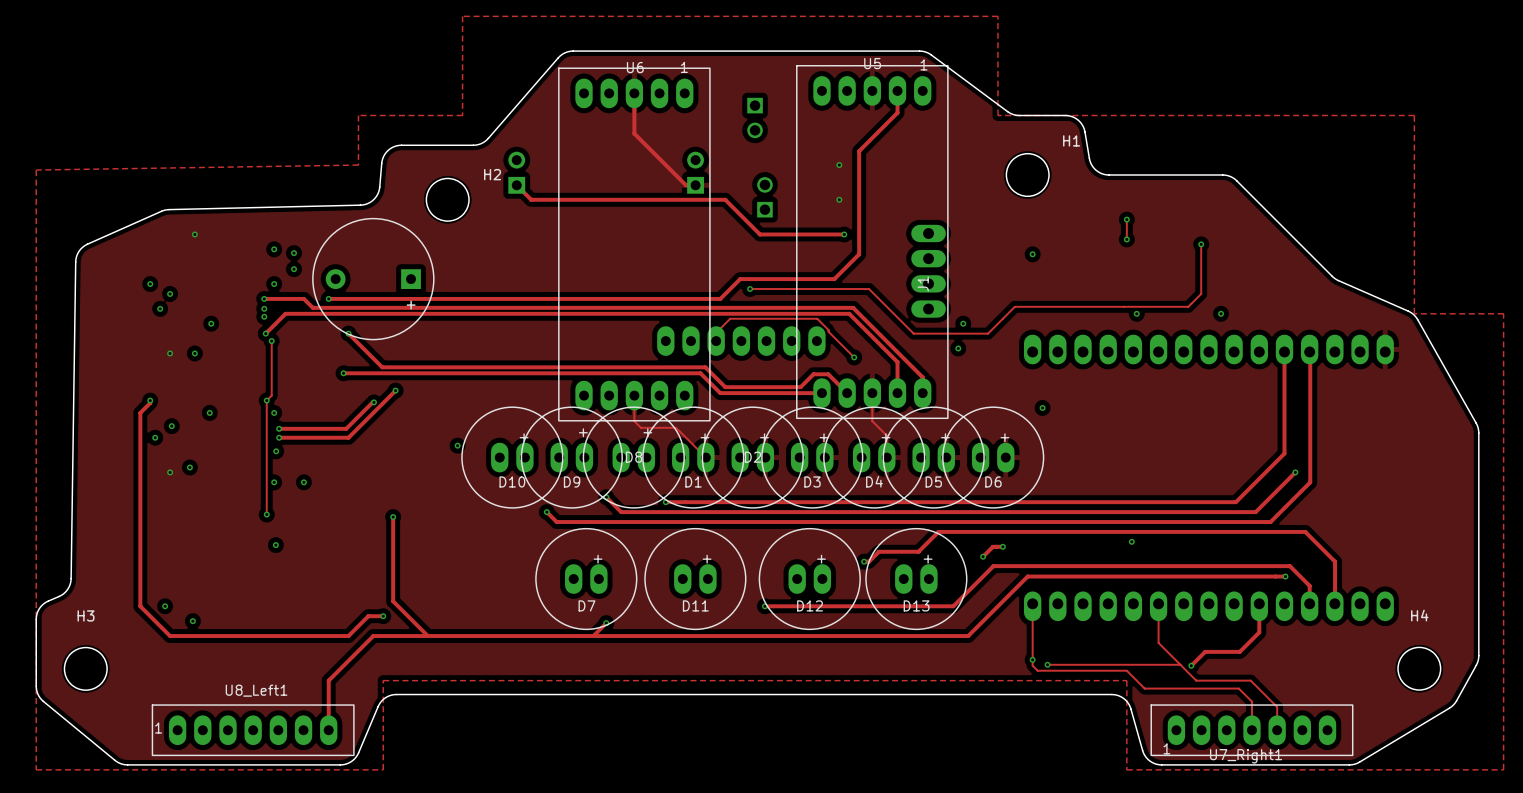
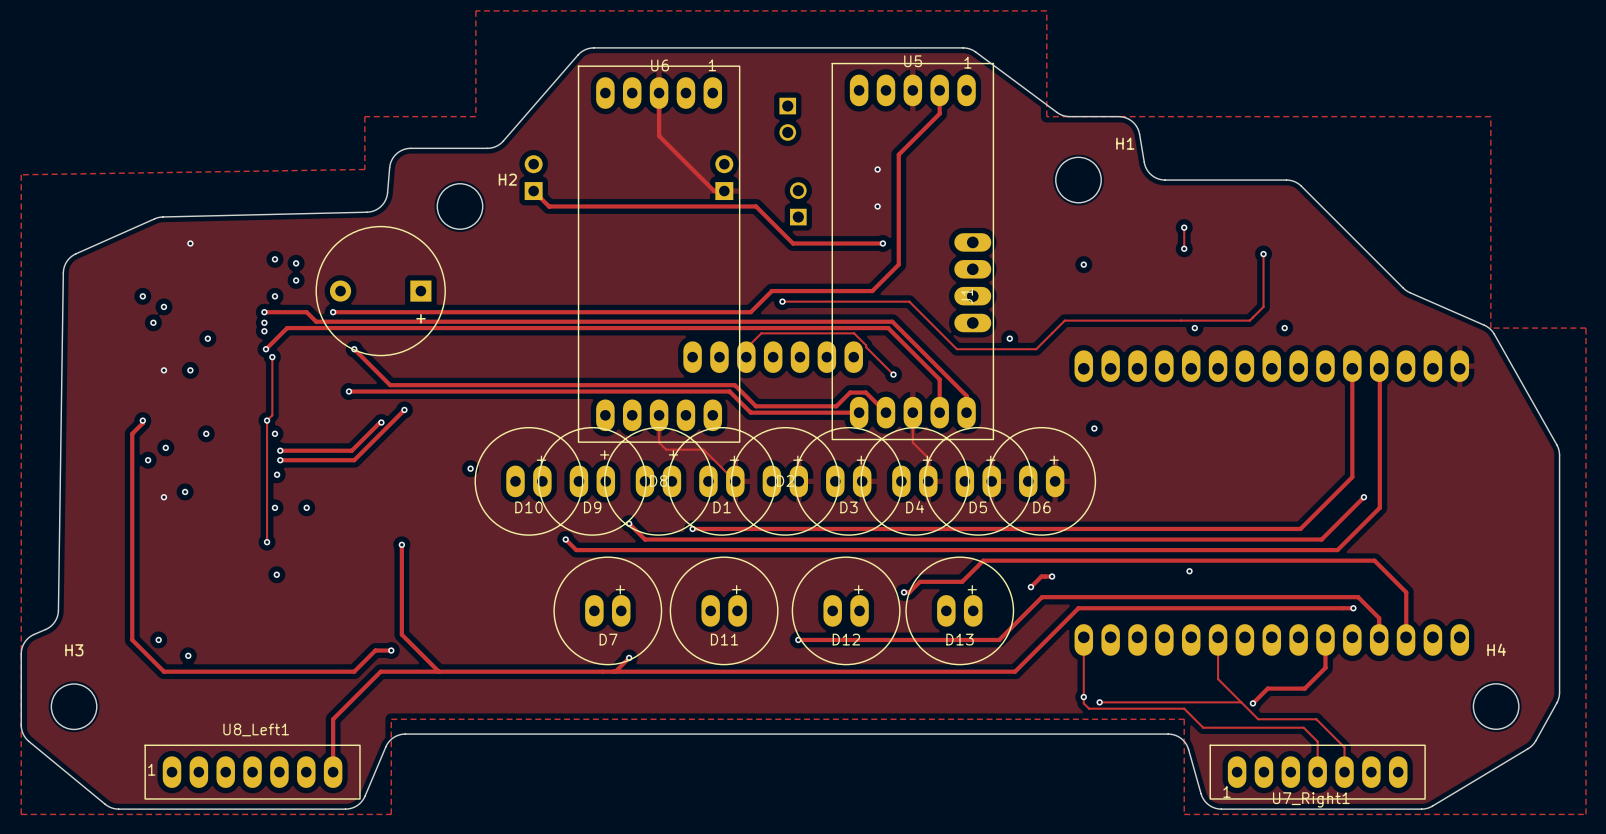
via: (958, 348) -> none

